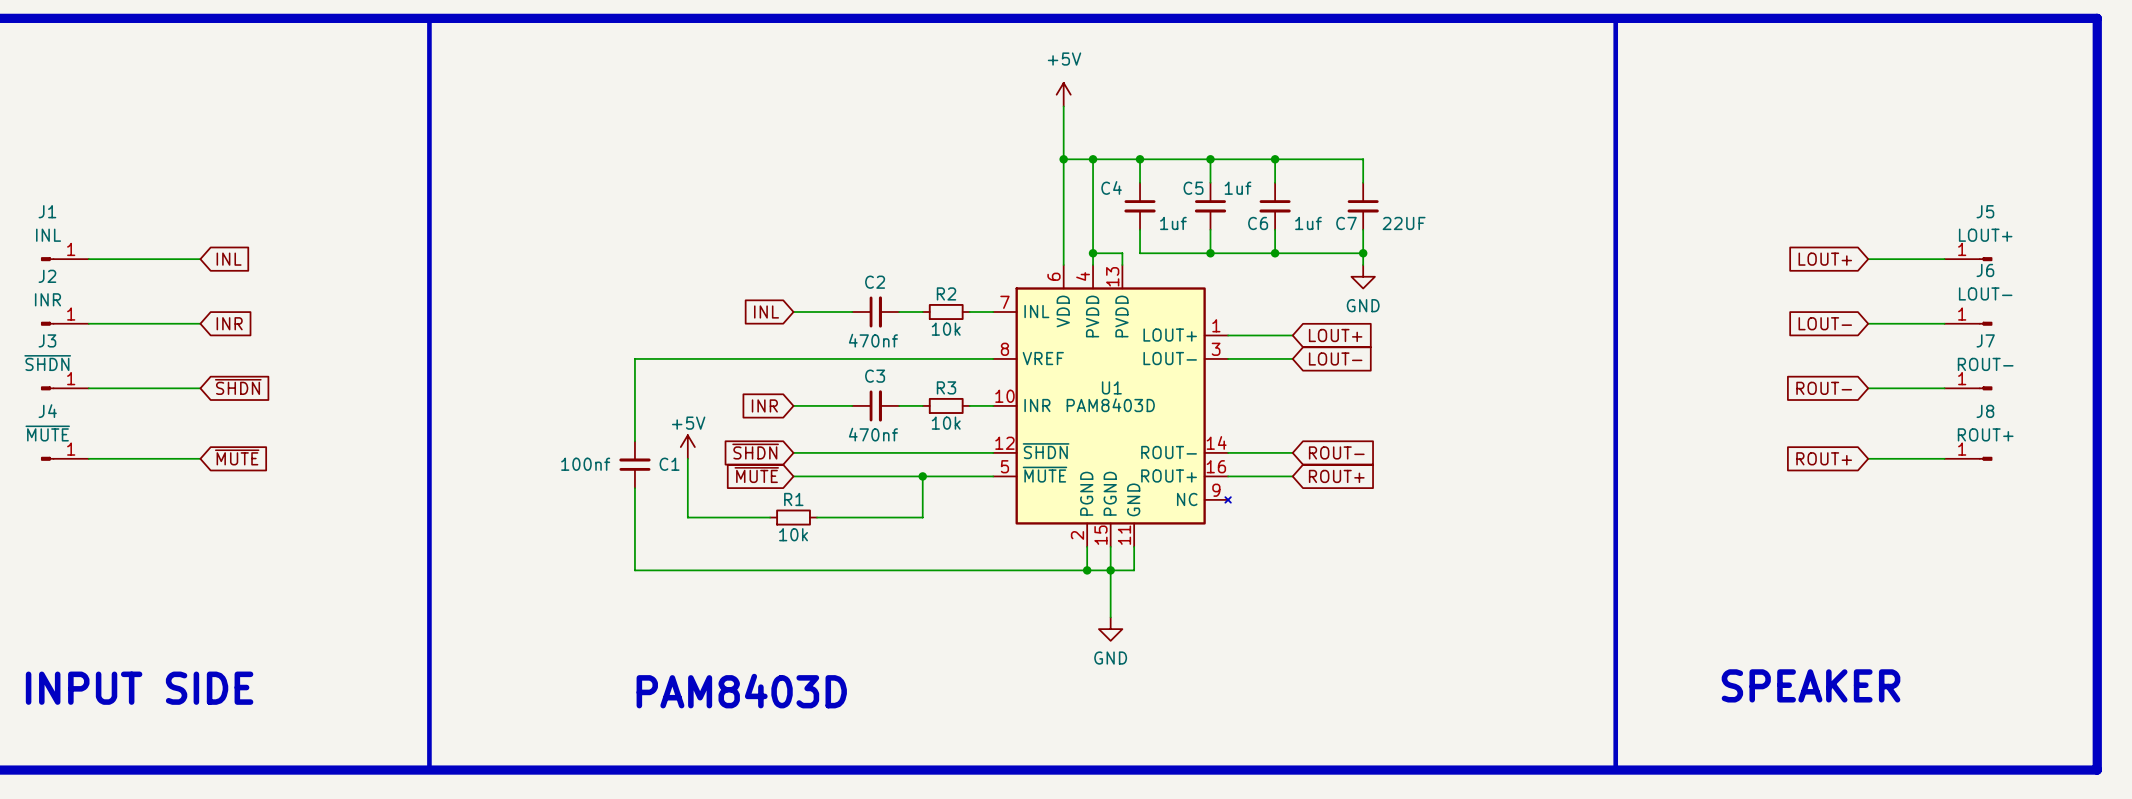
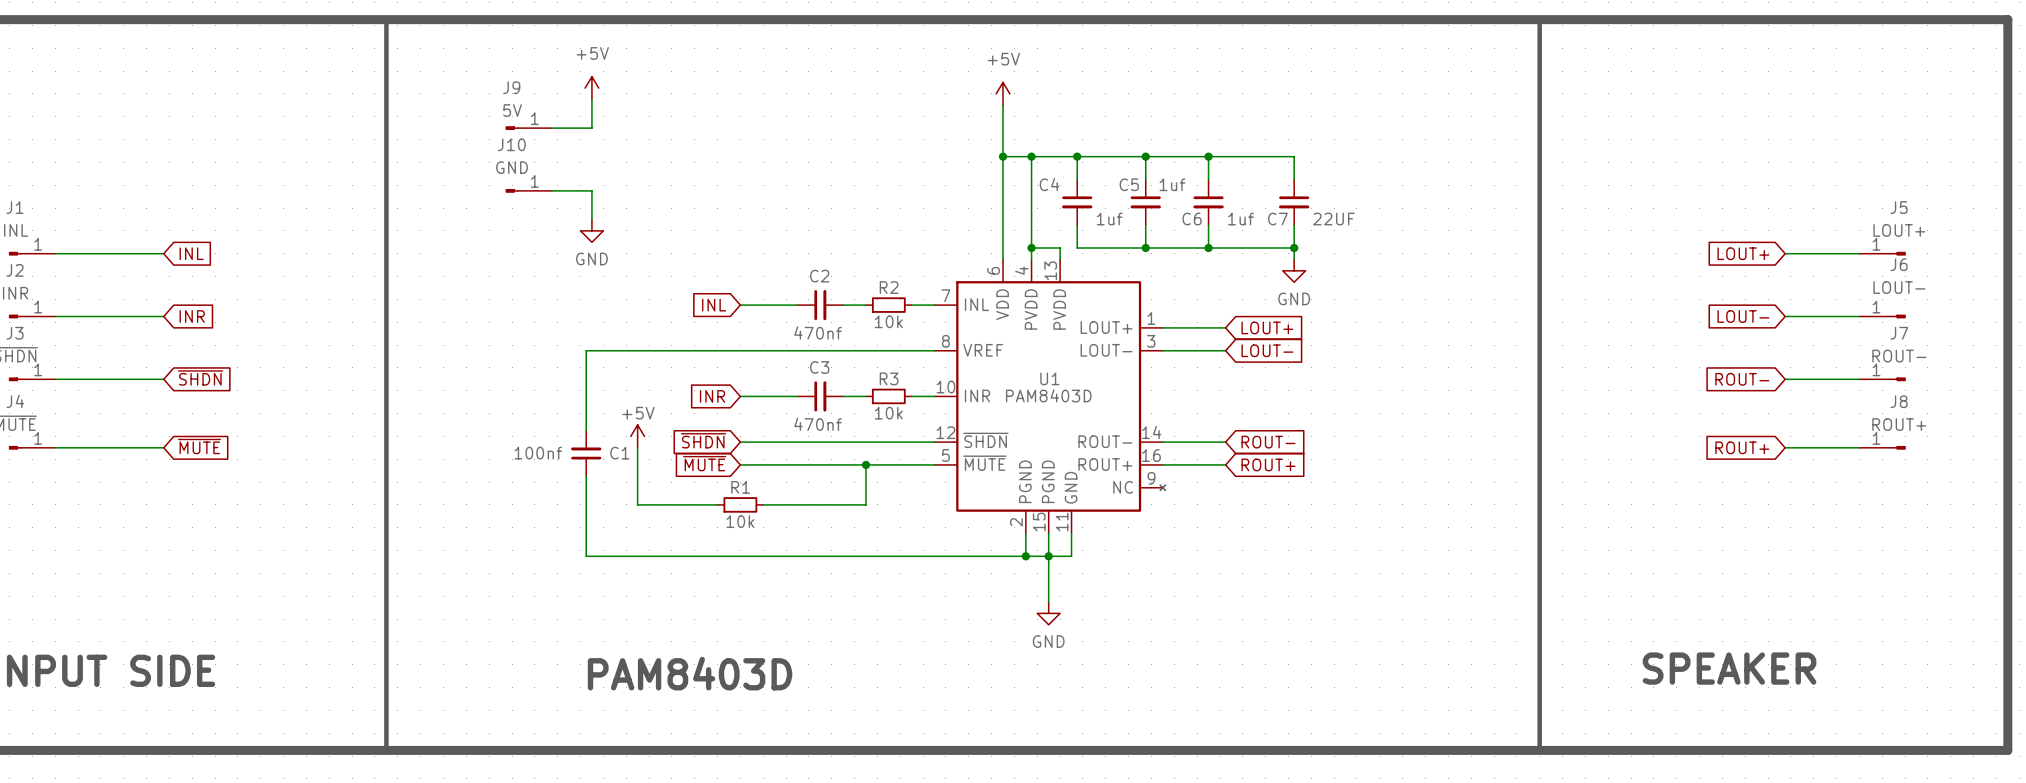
power symbol: none -> +5V (591, 88)
wire: none -> (591, 99) (591, 128) (551, 128)
J9: none -> 5V (528, 128)
J10: none -> GND (528, 190)
wire: none -> (551, 190) (591, 190) (591, 219)
power symbol: none -> GND (591, 230)

